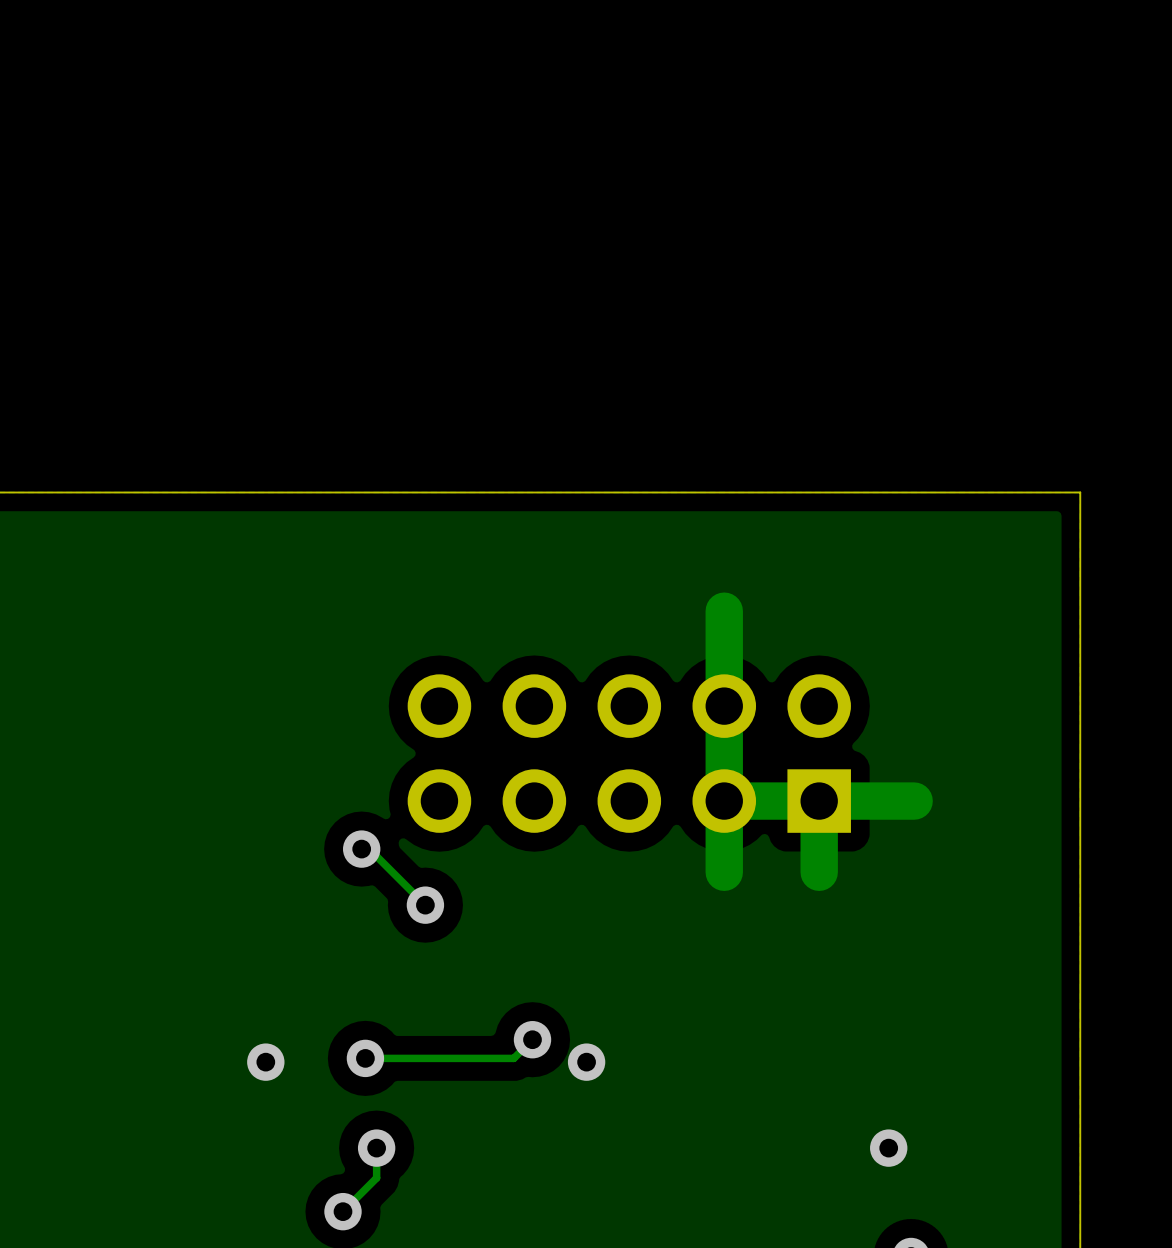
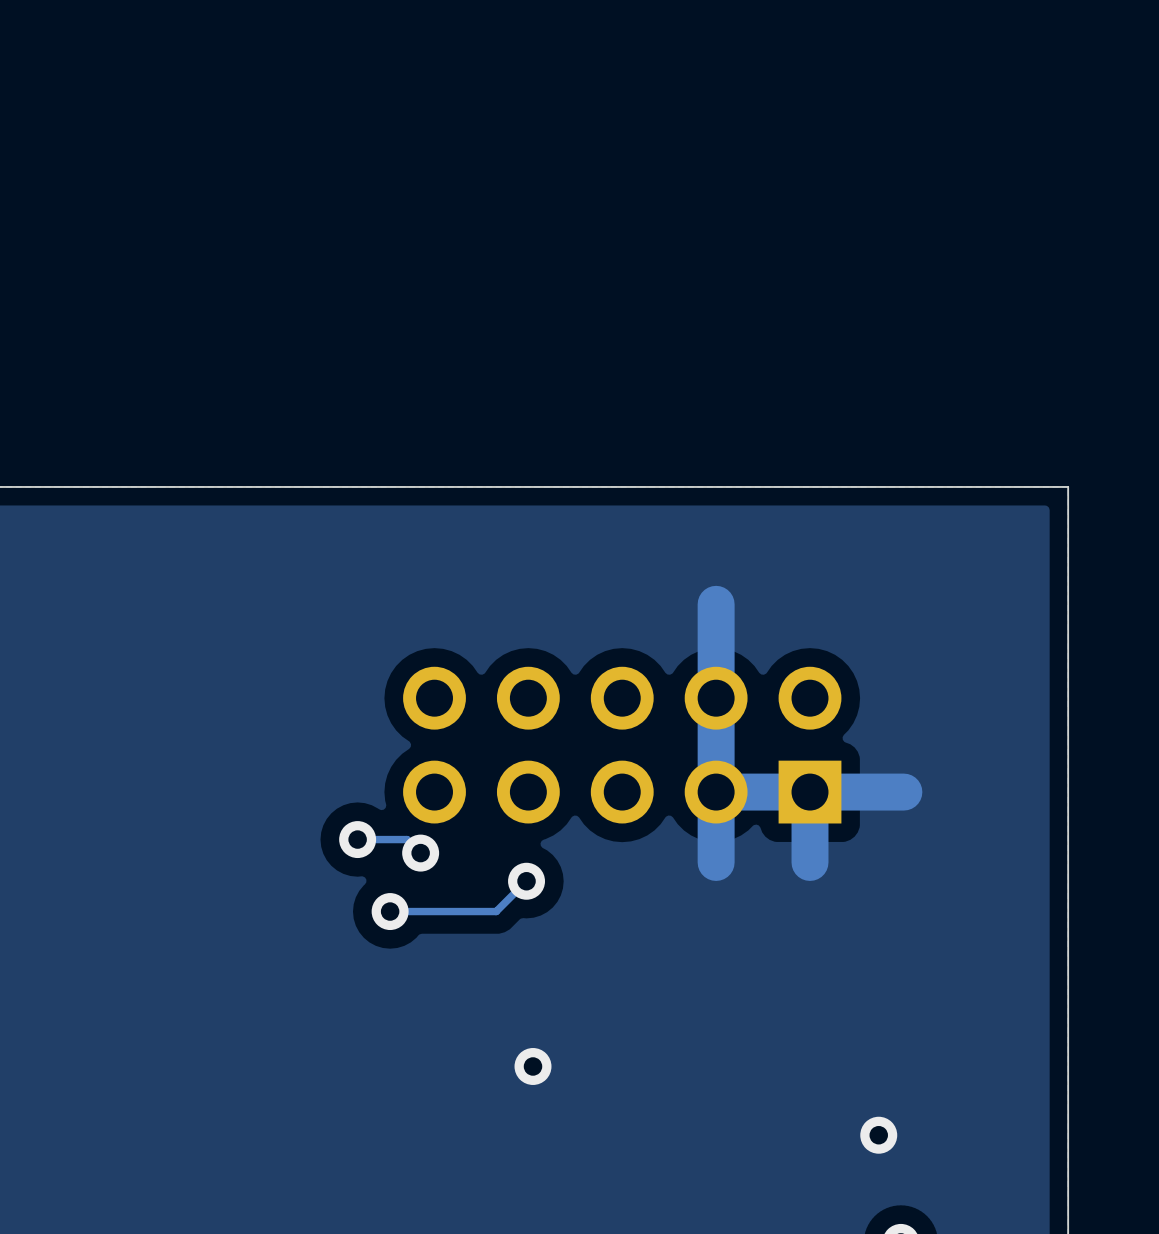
track: (369, 849) (425, 905) -> (365, 839) (407, 839) (420, 853)
via: none -> (420, 853)
track: none -> (526, 881) (496, 911) (390, 911)
via: none -> (526, 881)
via position: (425, 905) -> (390, 911)
track: (532, 1039) (513, 1058) (365, 1058) -> none
via: (532, 1039) -> none
via: (365, 1058) -> none
via: (265, 1062) -> none
via: (586, 1062) -> none
via: none -> (533, 1066)
track: (376, 1148) (376, 1178) (342, 1211) -> none
via: (376, 1148) -> none
via: (342, 1211) -> none

